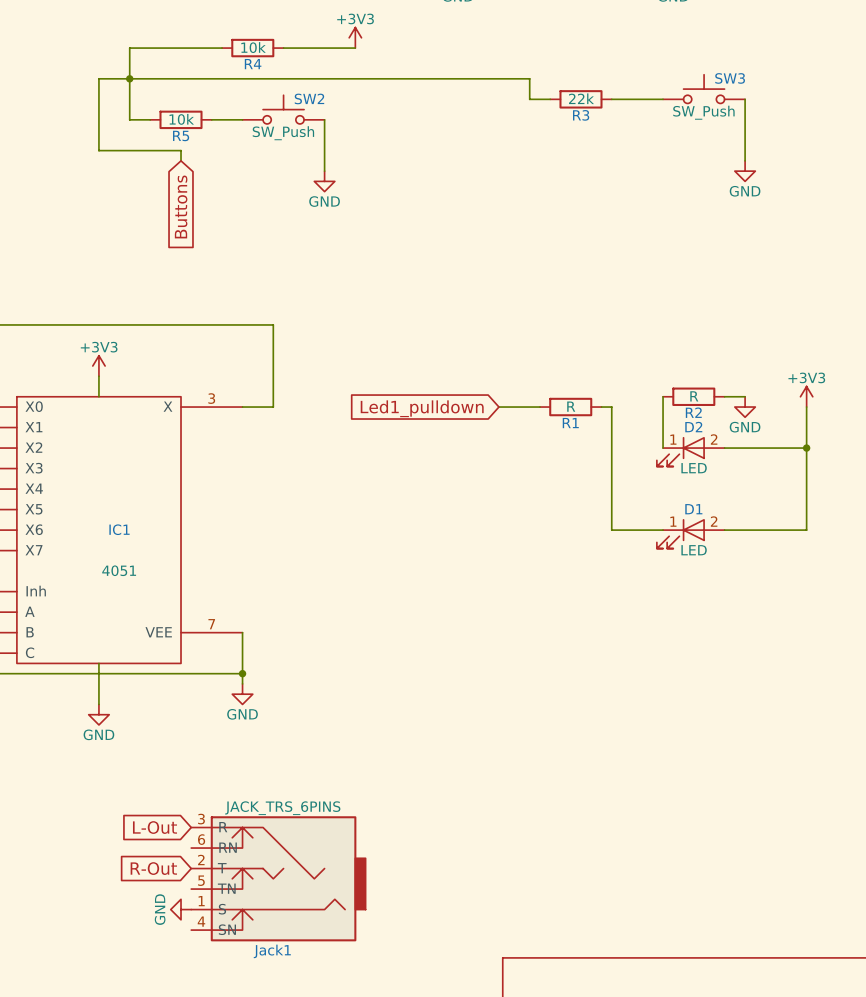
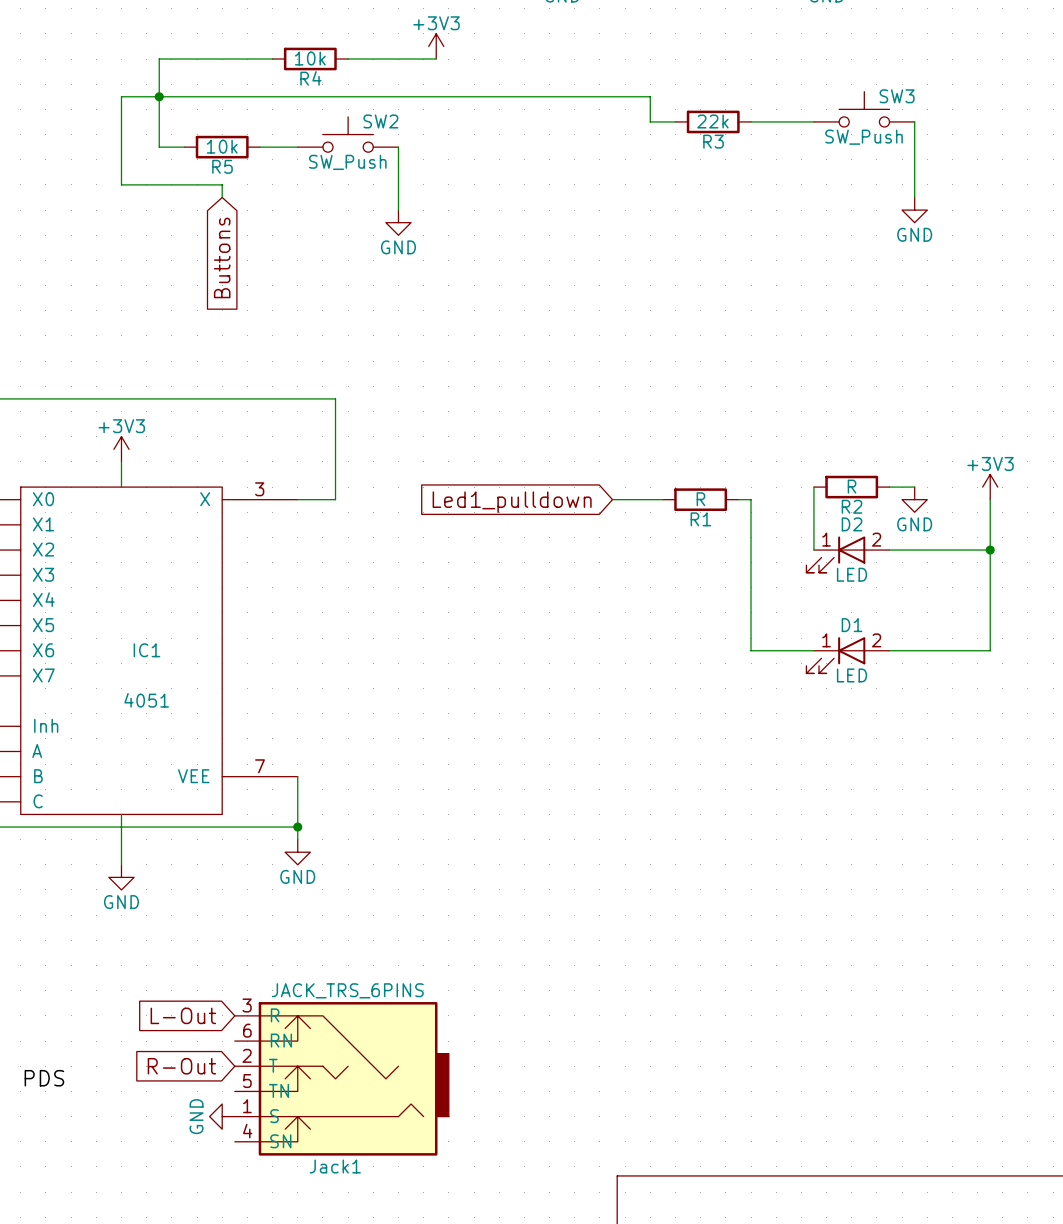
label: none -> PDS (44, 1078)

